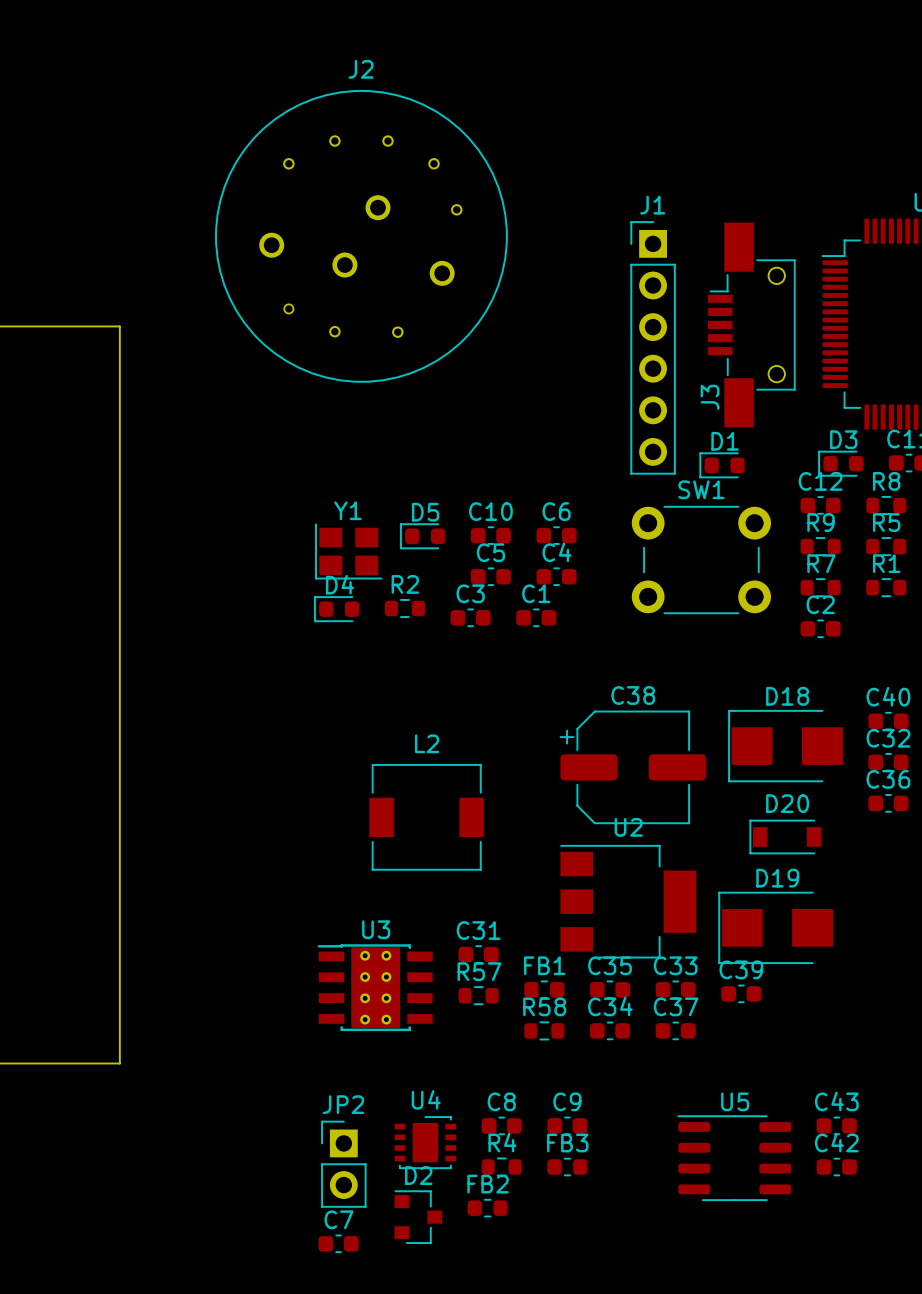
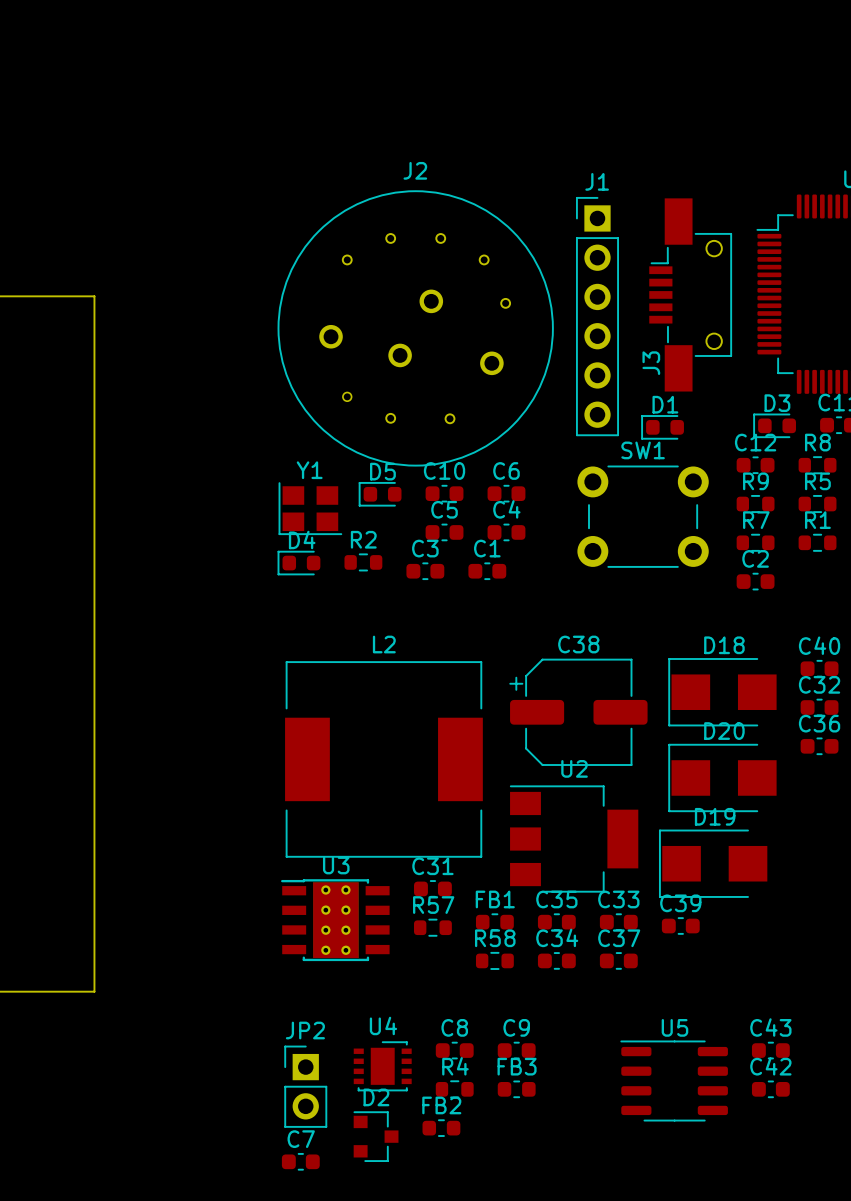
J2 position: (361, 236) -> (415, 328)
L2 name position: L2 (427, 743) -> L2 (384, 644)
L2 footprint: [369, 763, 485, 871] -> [285, 661, 483, 858]
D20 footprint: [749, 819, 822, 855] -> [668, 743, 777, 813]

